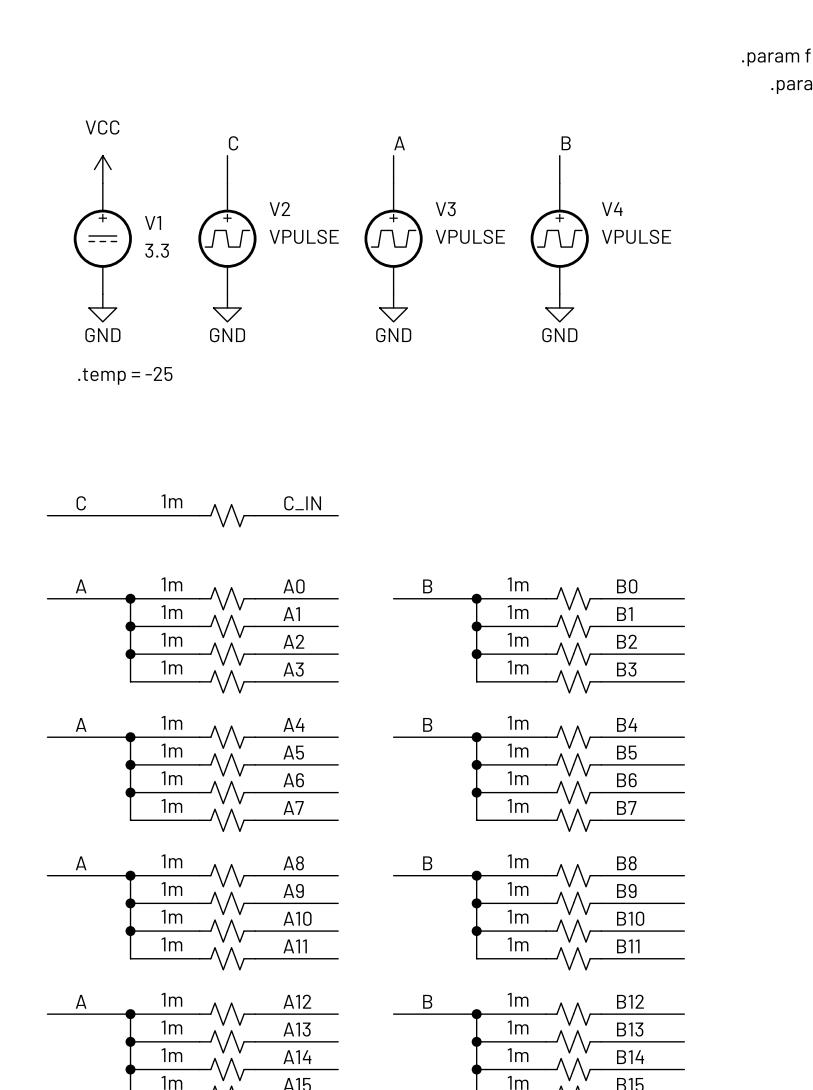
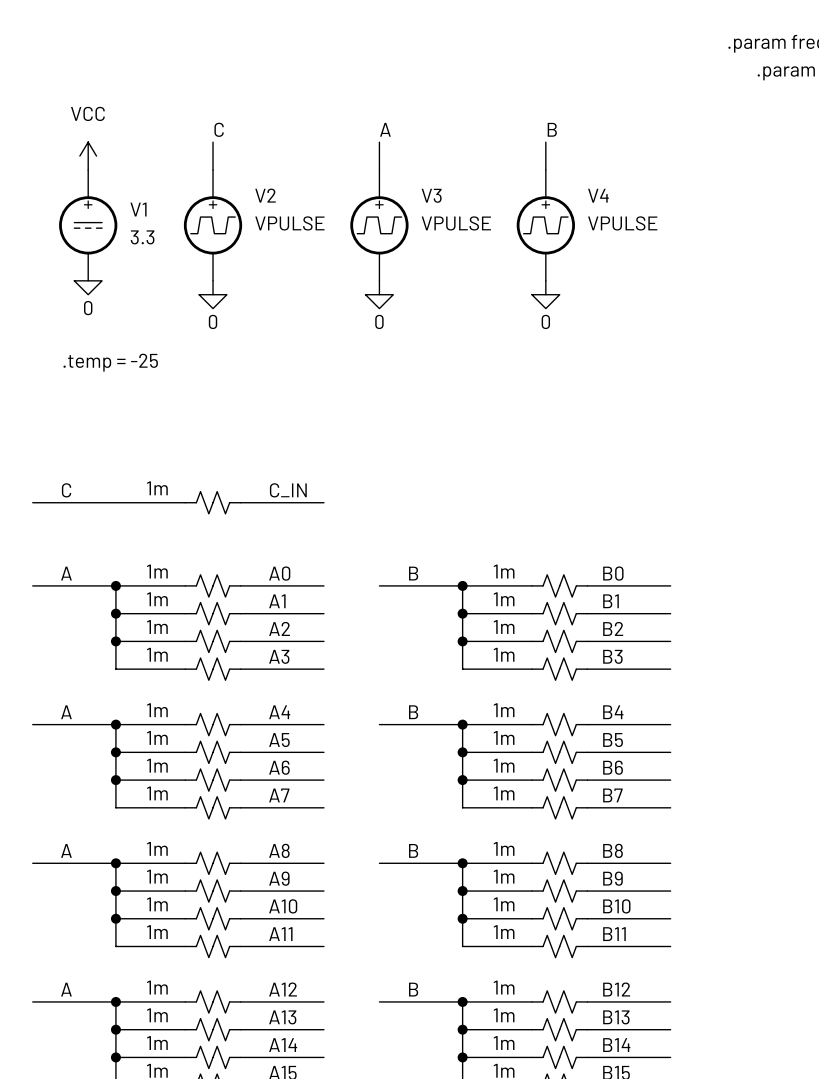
wire: (102, 294) (102, 307) -> none
power symbol: none -> 0 (88, 287)
power symbol: GND (102, 314) -> none
power symbol: GND (227, 314) -> 0 (213, 301)
power symbol: GND (393, 314) -> 0 (379, 301)
power symbol: GND (559, 314) -> 0 (545, 301)

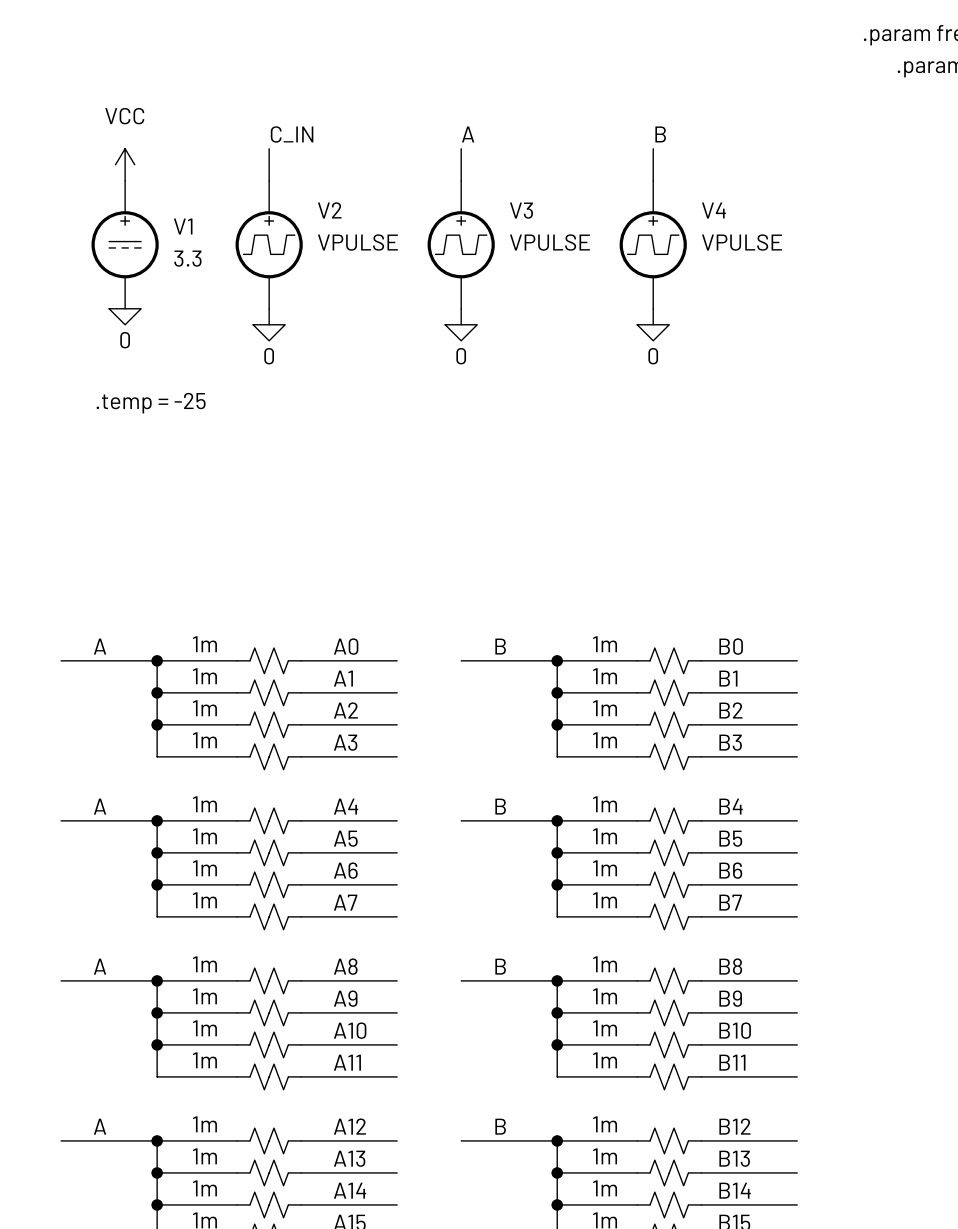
label: C (219, 129) -> C_IN (292, 134)
label: C (66, 490) -> none
label: C_IN (288, 490) -> none
wire: (32, 502) (185, 502) -> none
part: 1m (213, 502) -> none
wire: (240, 502) (323, 502) -> none

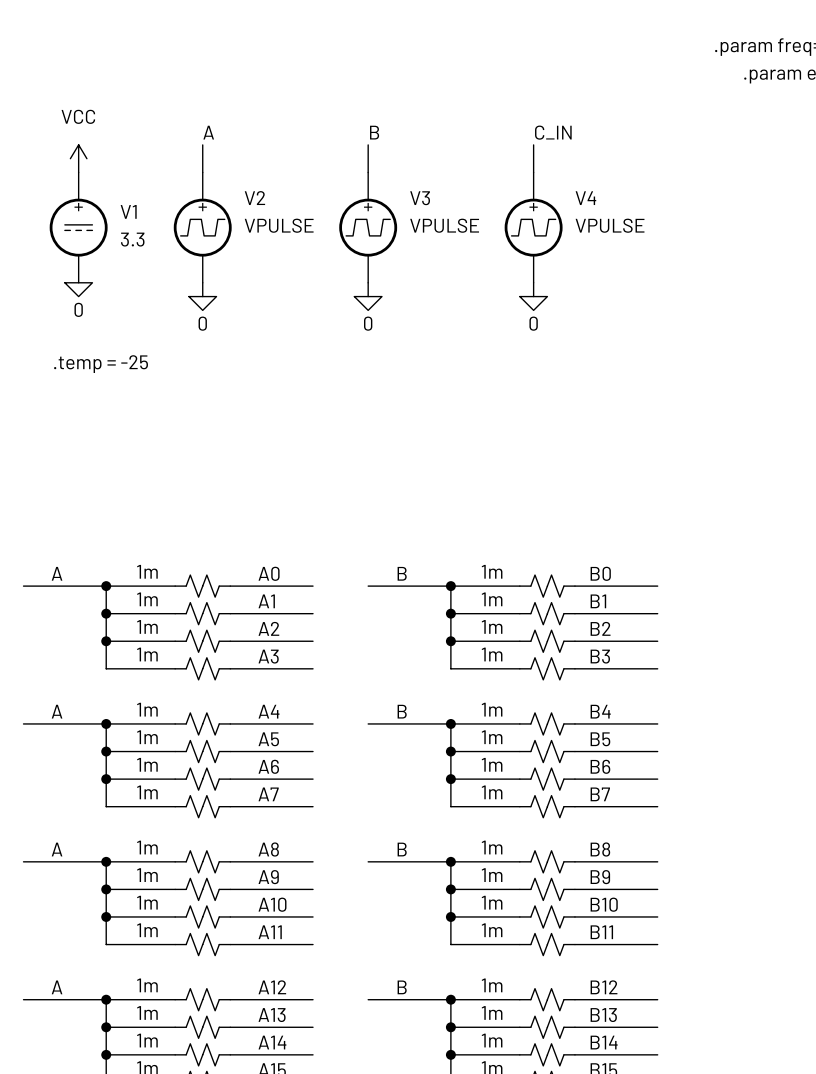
label: C_IN (292, 134) -> A (208, 132)
label: A (468, 134) -> B (374, 132)
label: B (660, 134) -> C_IN (553, 132)

